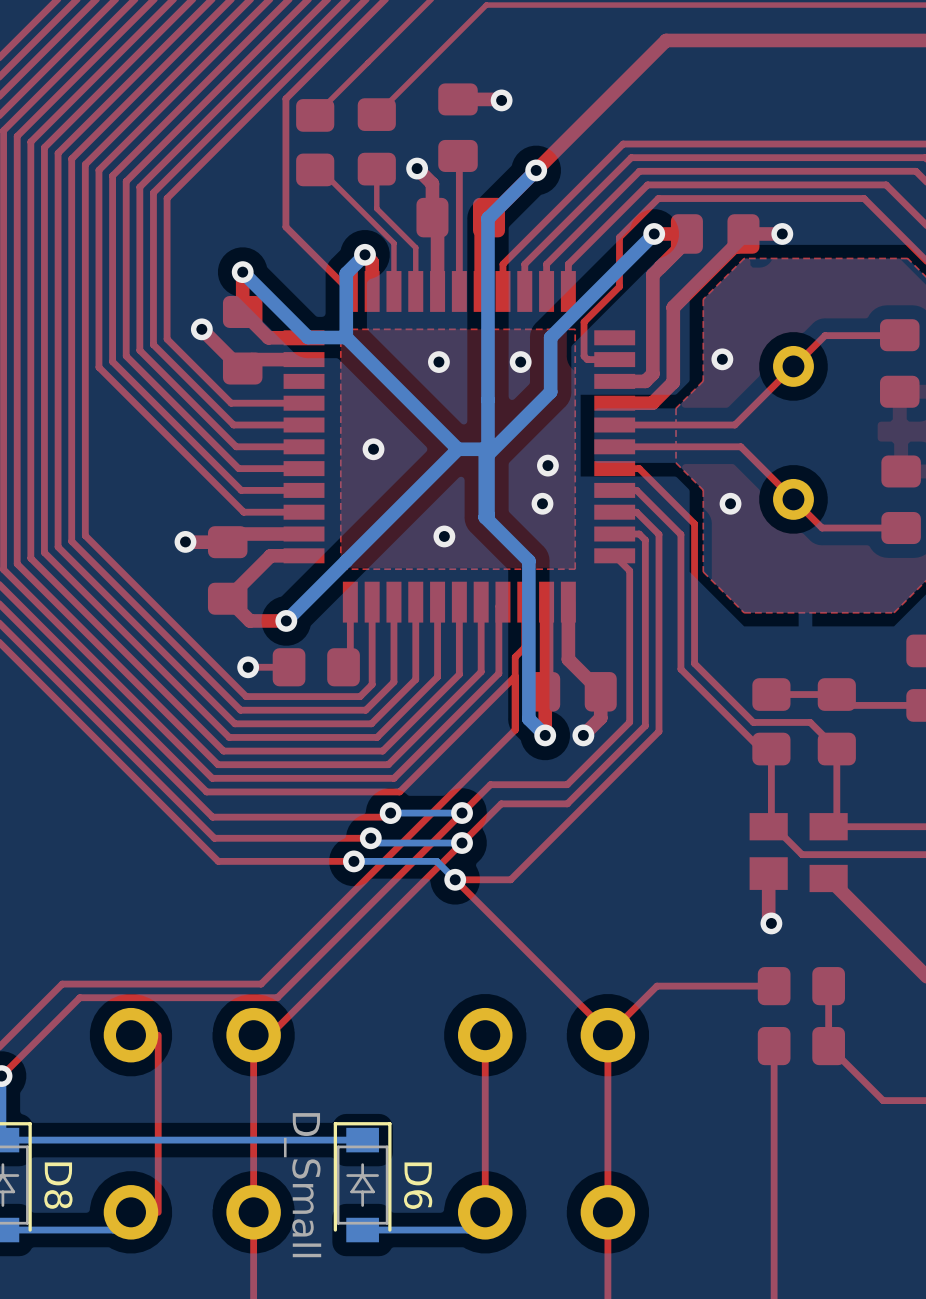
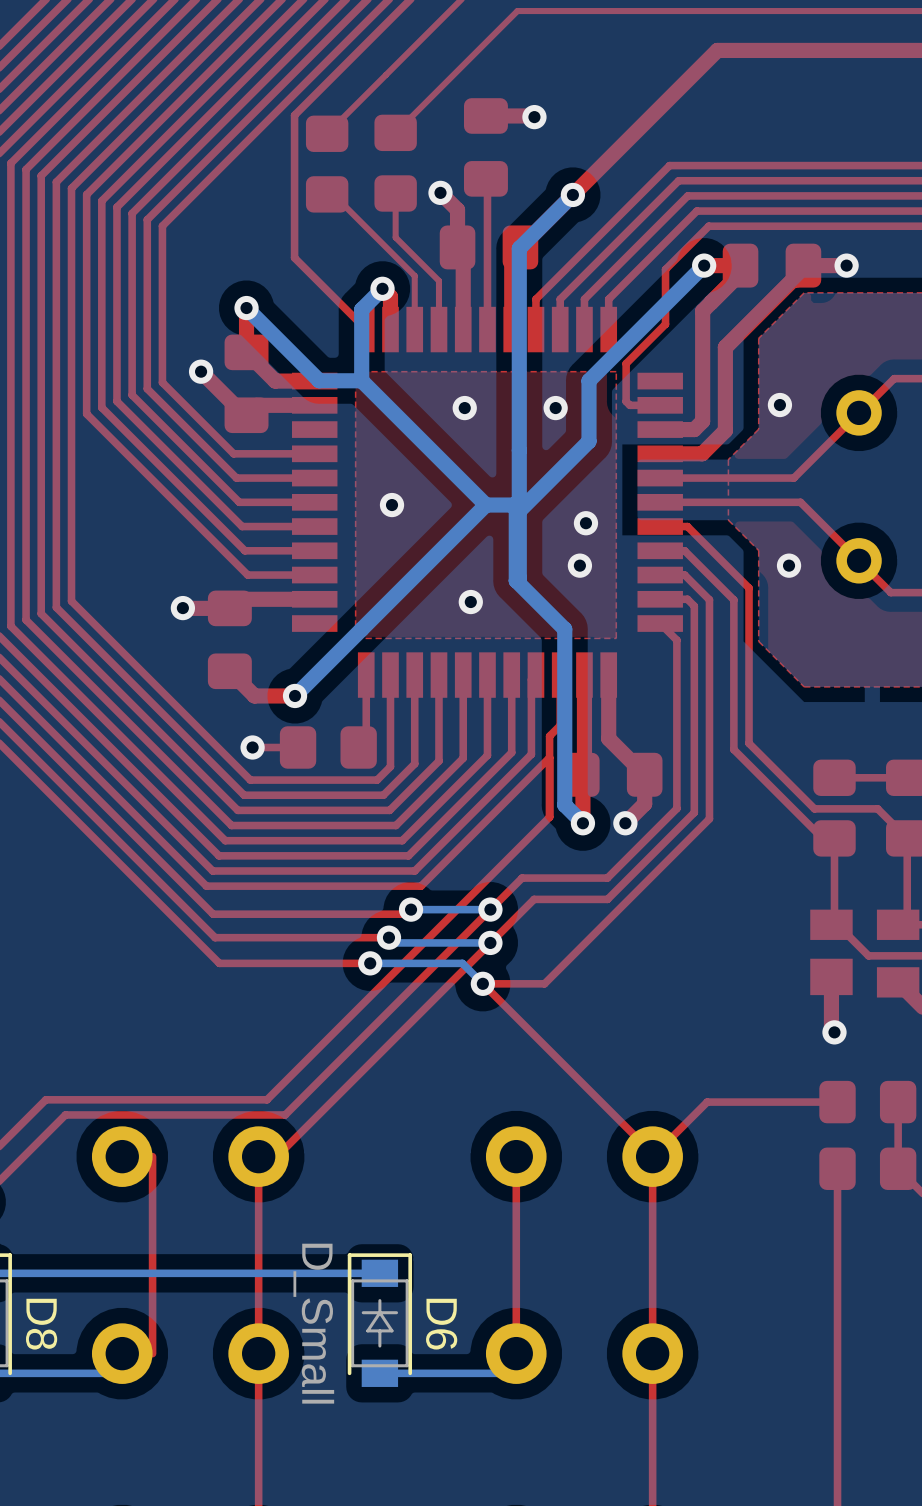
top track: (304, 555) (270, 555) (227, 598) -> none

